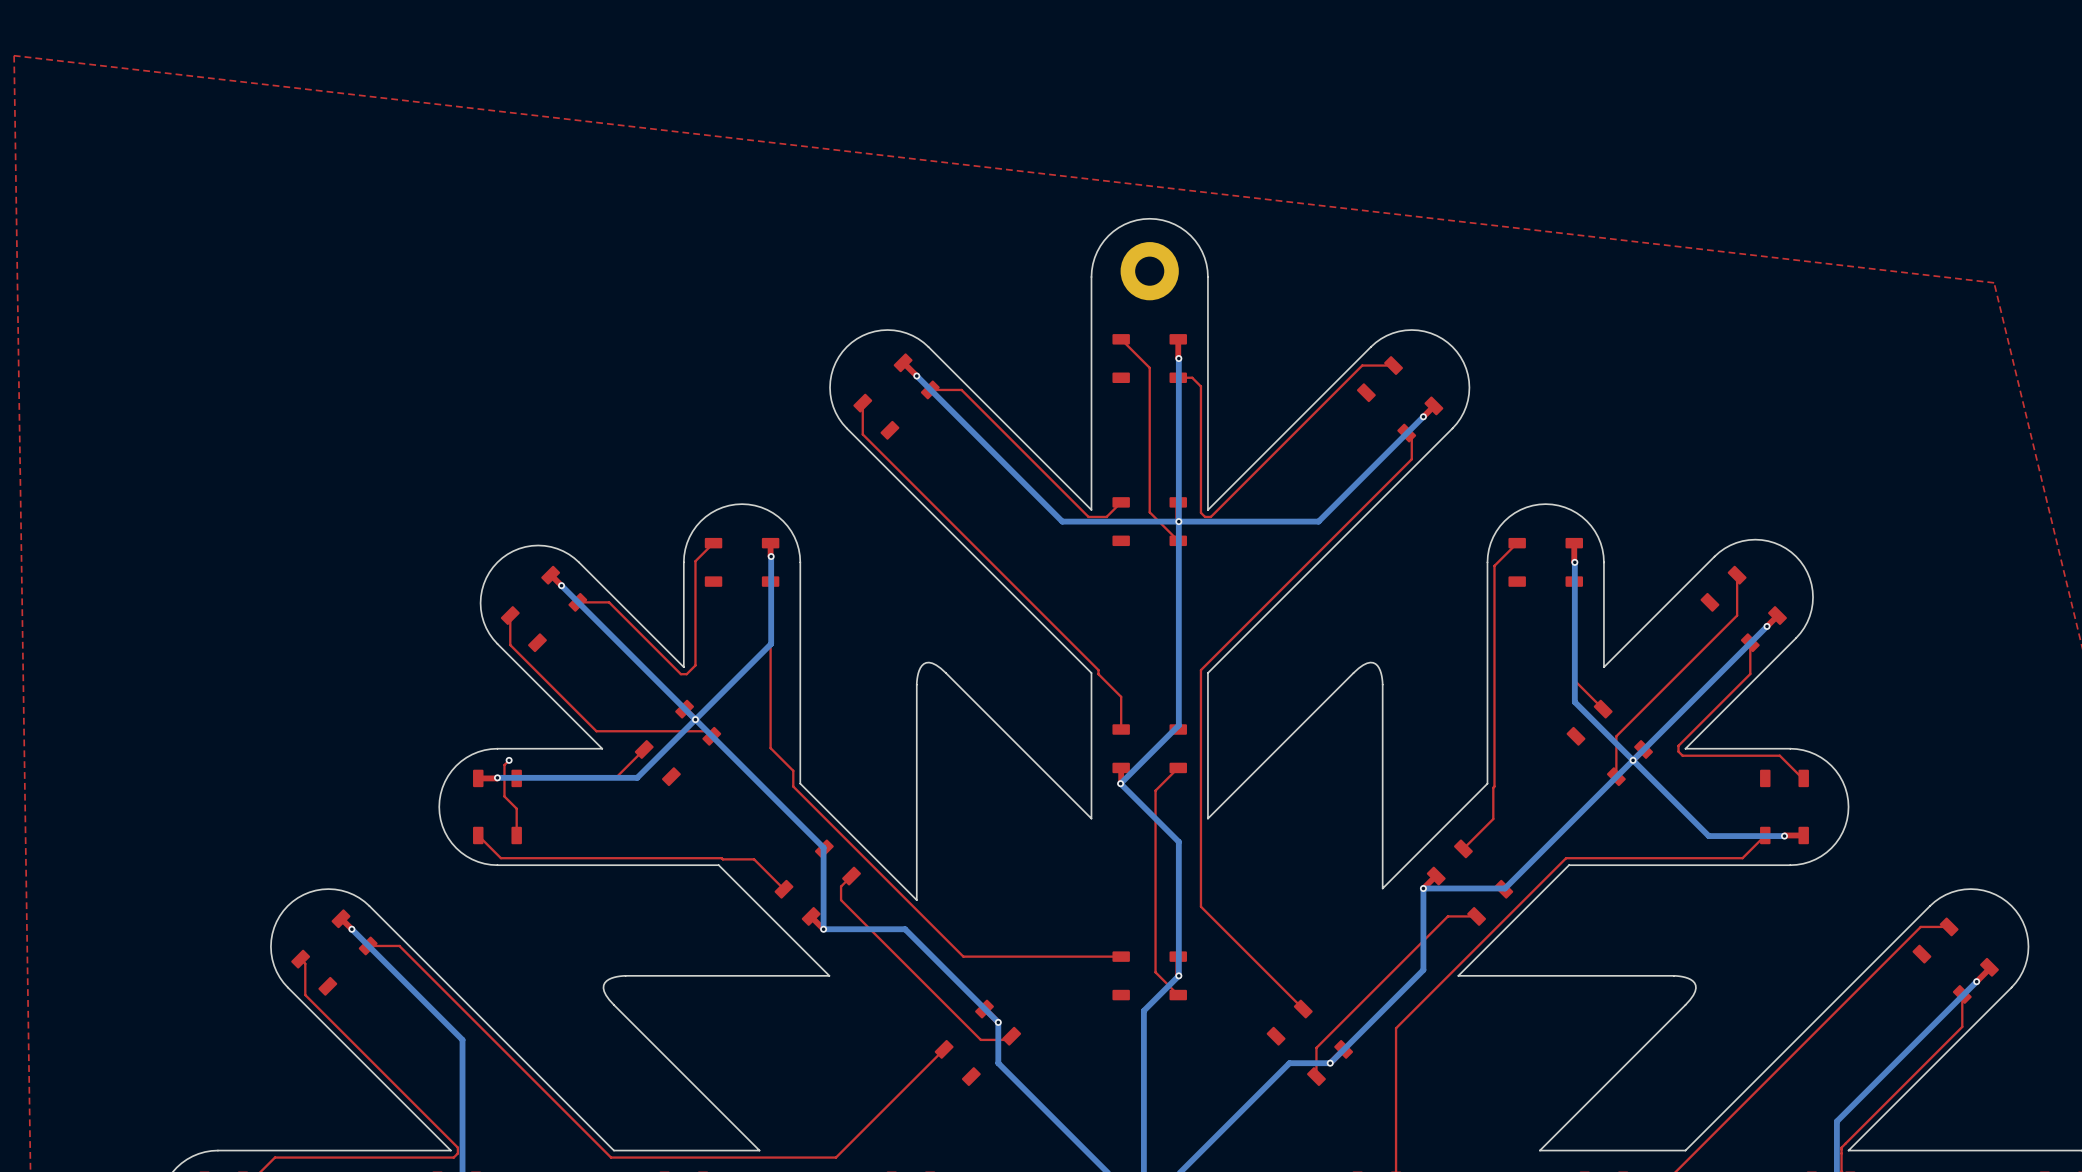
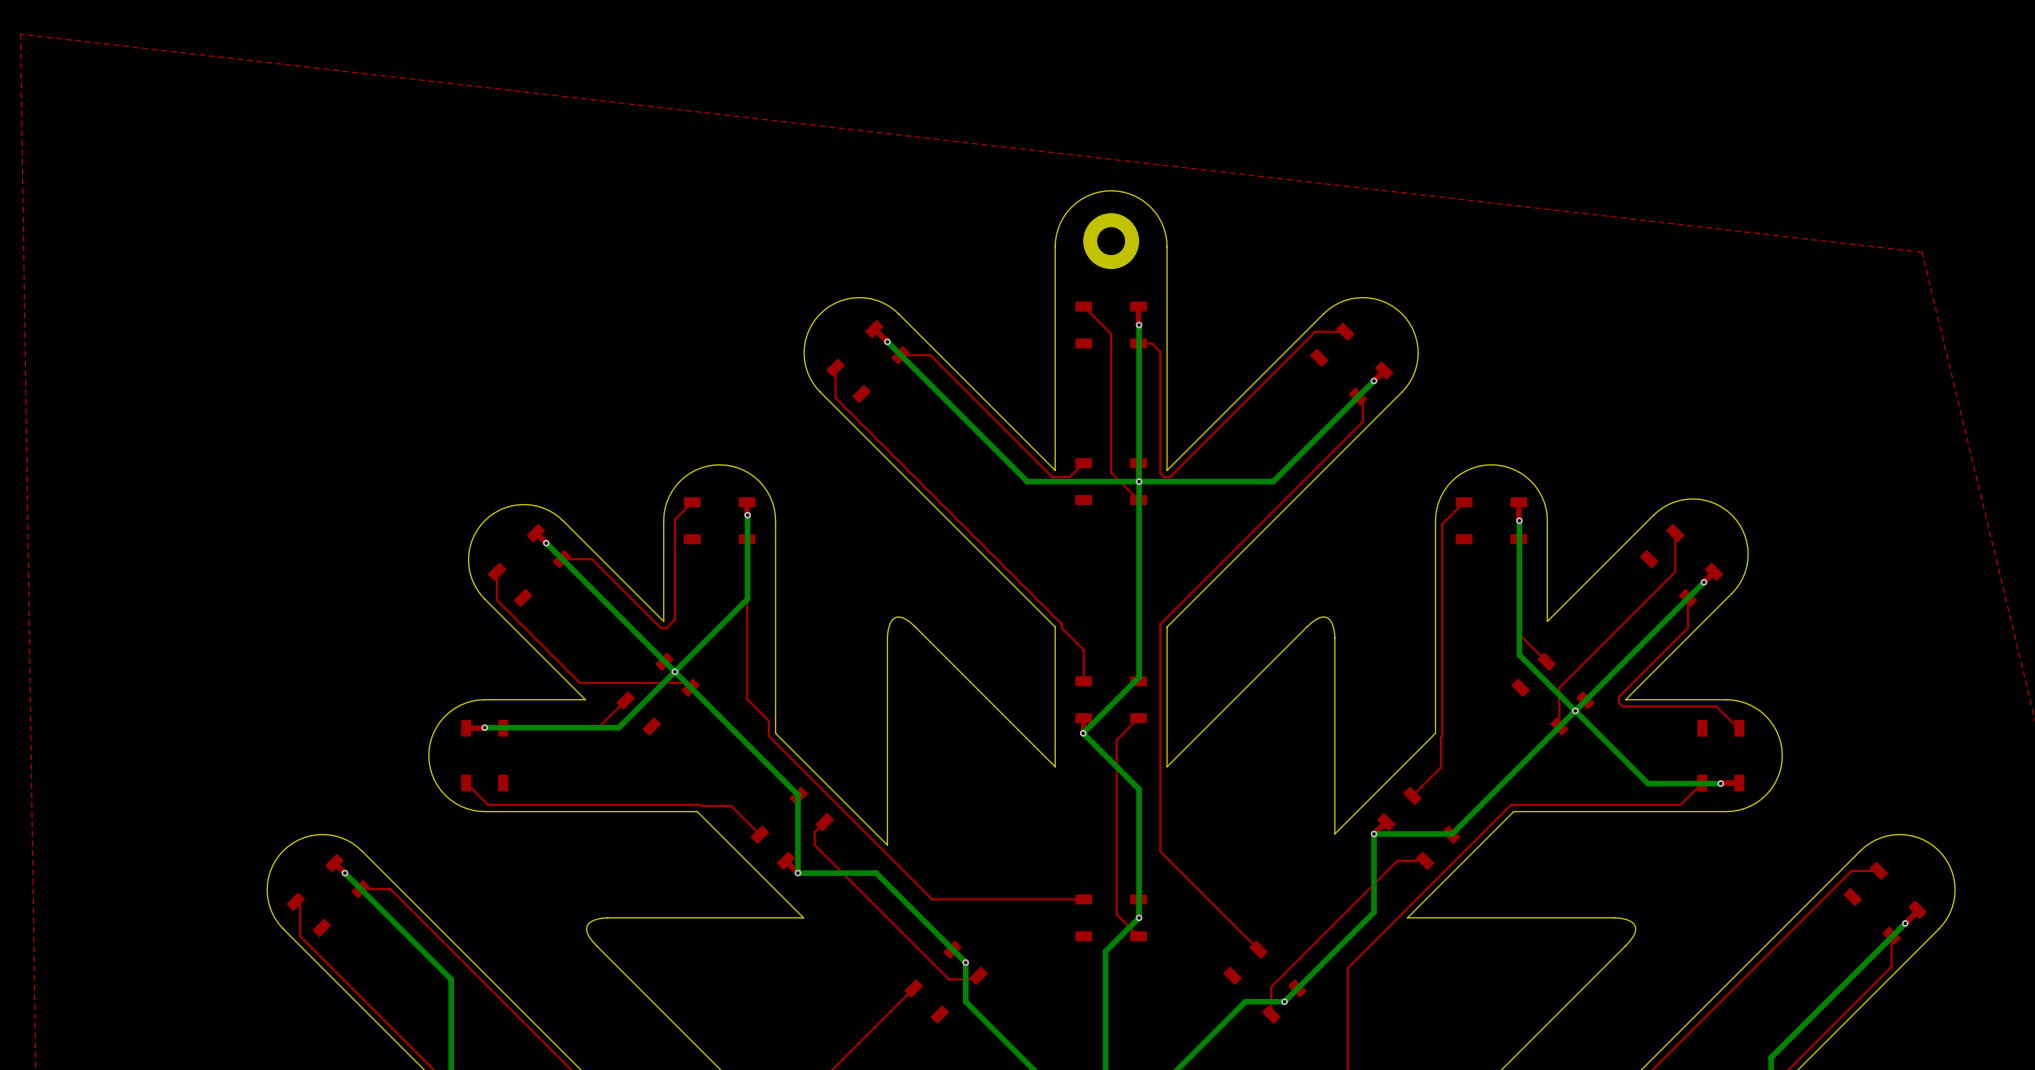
top track: (509, 760) (504, 765) (504, 796) (516, 808) (516, 835) -> none
via: (509, 760) -> none

